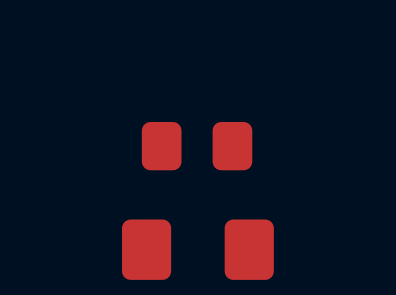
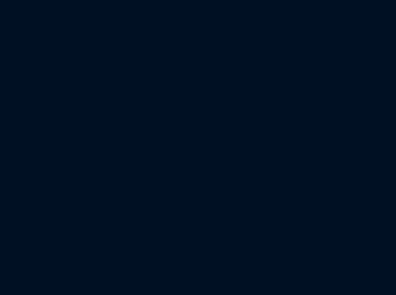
part: (197, 146) -> none
part: (197, 249) -> none

